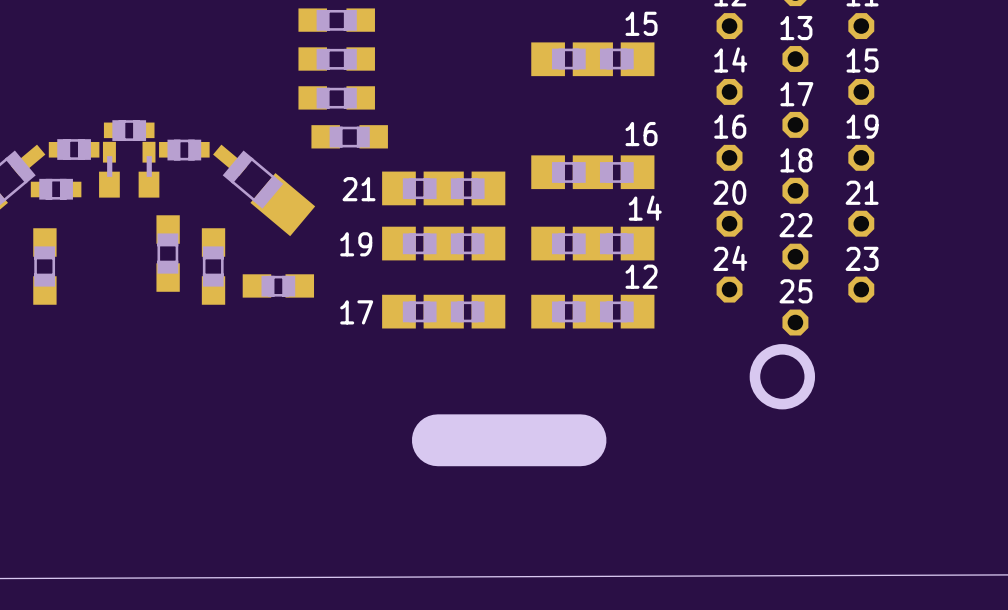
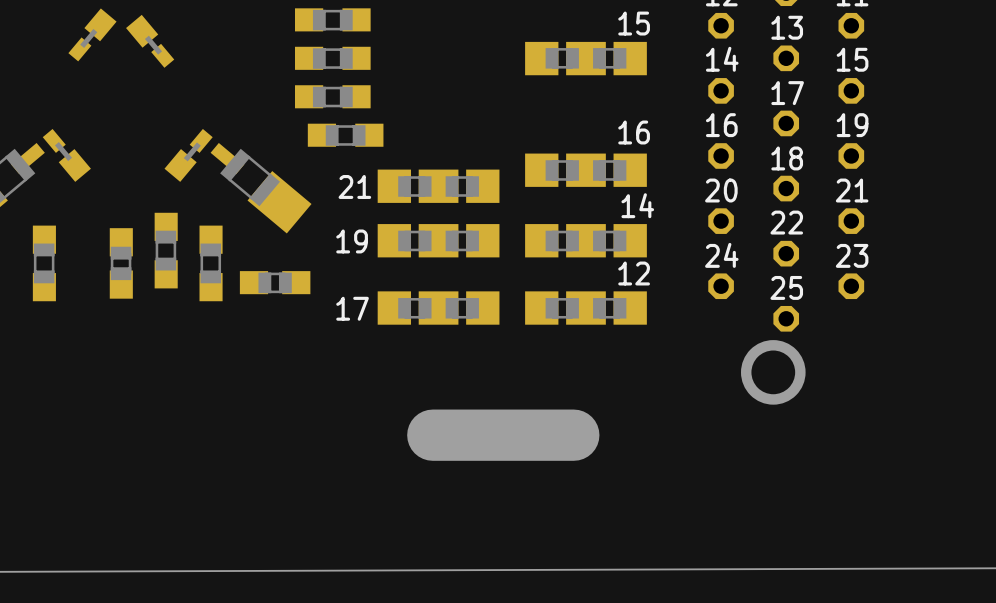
part: none -> (92, 34)
part: none -> (150, 41)
part: (129, 130) -> none
part footprint: [48, 139, 100, 160] -> [42, 128, 91, 182]
part footprint: [159, 139, 210, 161] -> [164, 128, 213, 182]
part: (109, 169) -> none
part: (148, 169) -> none
part: (56, 189) -> none
part: none -> (121, 263)

